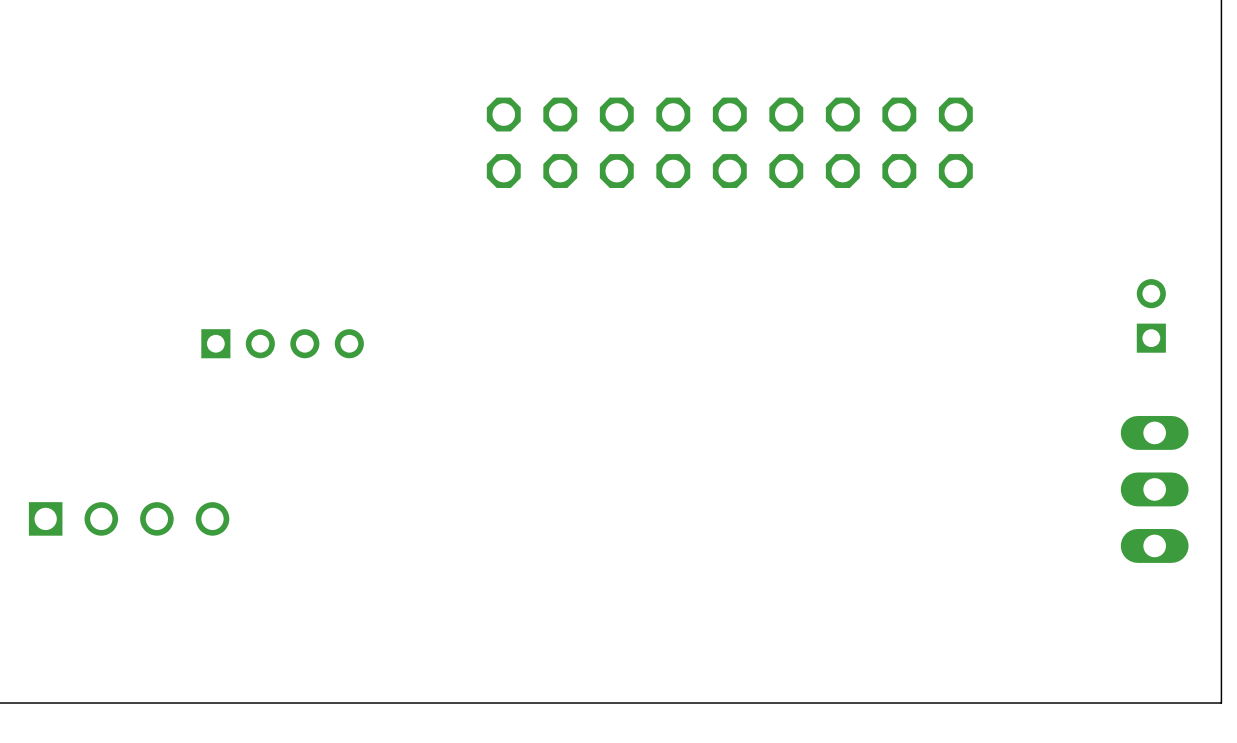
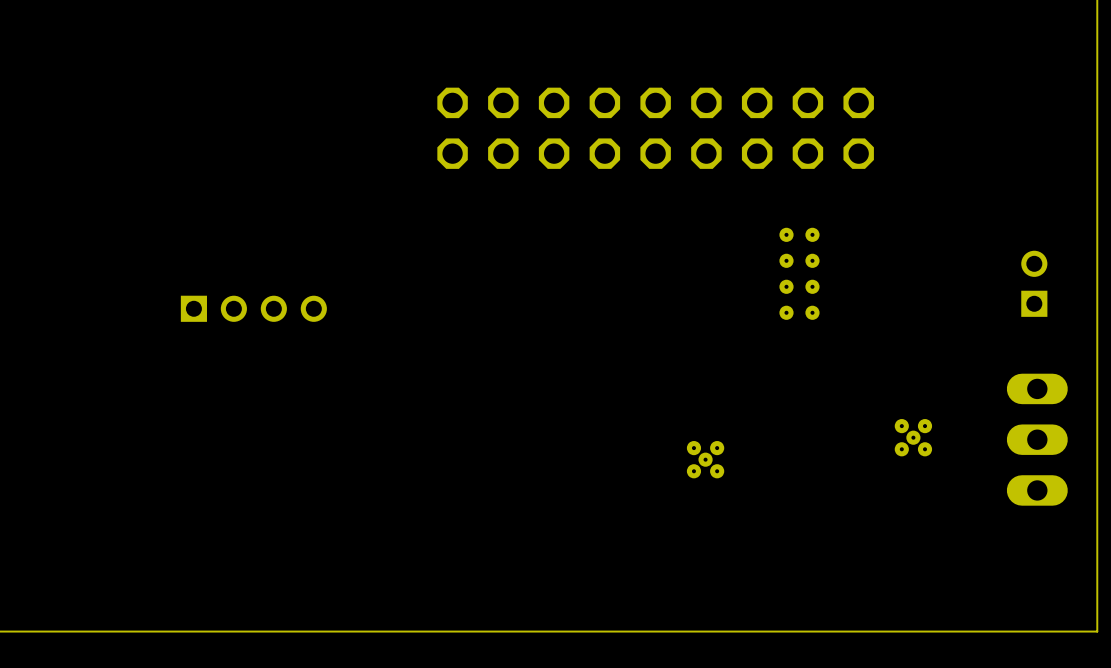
part: none -> (799, 273)
part: none -> (913, 437)
part: none -> (705, 459)
part: (129, 518) -> none

